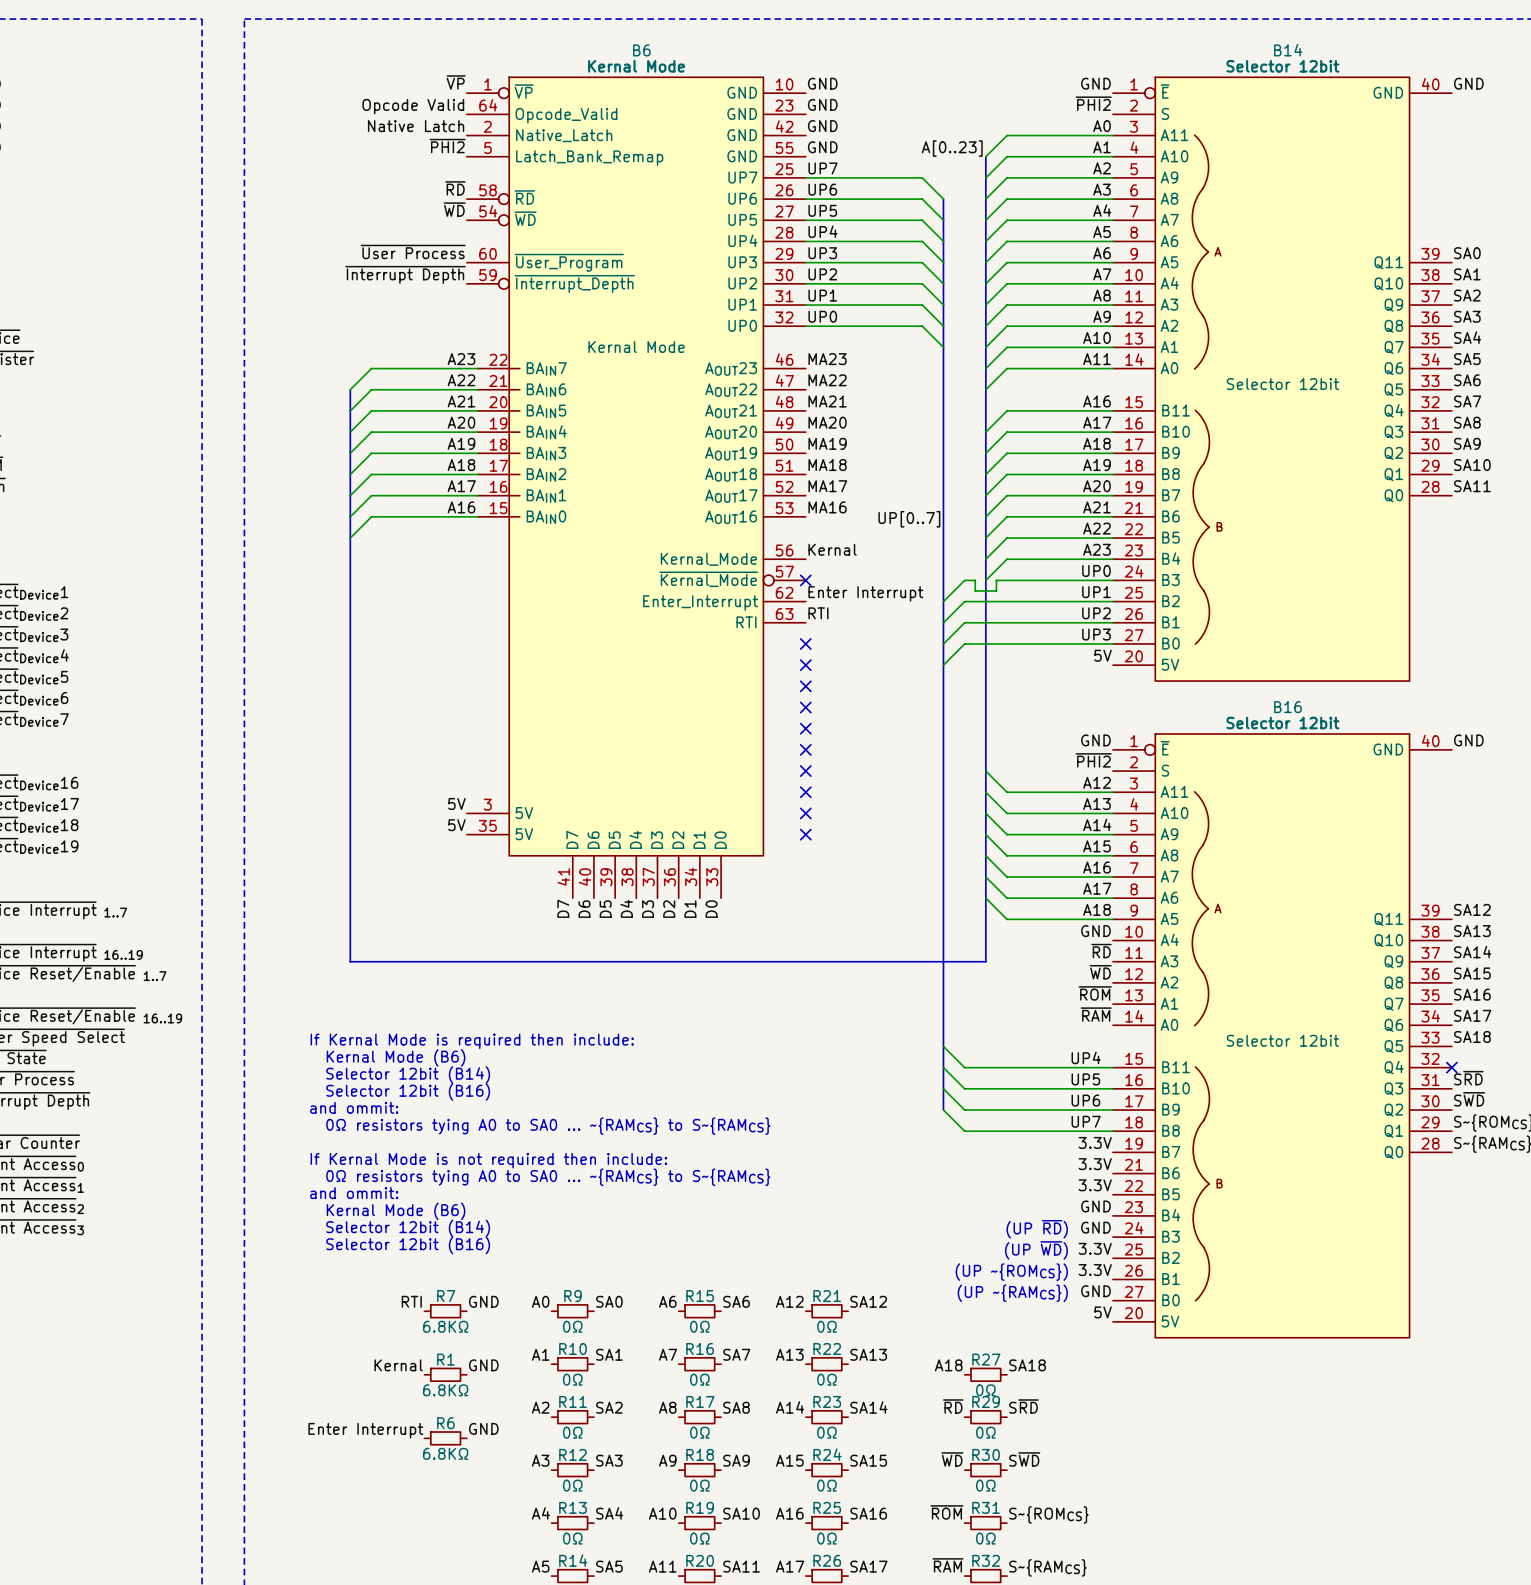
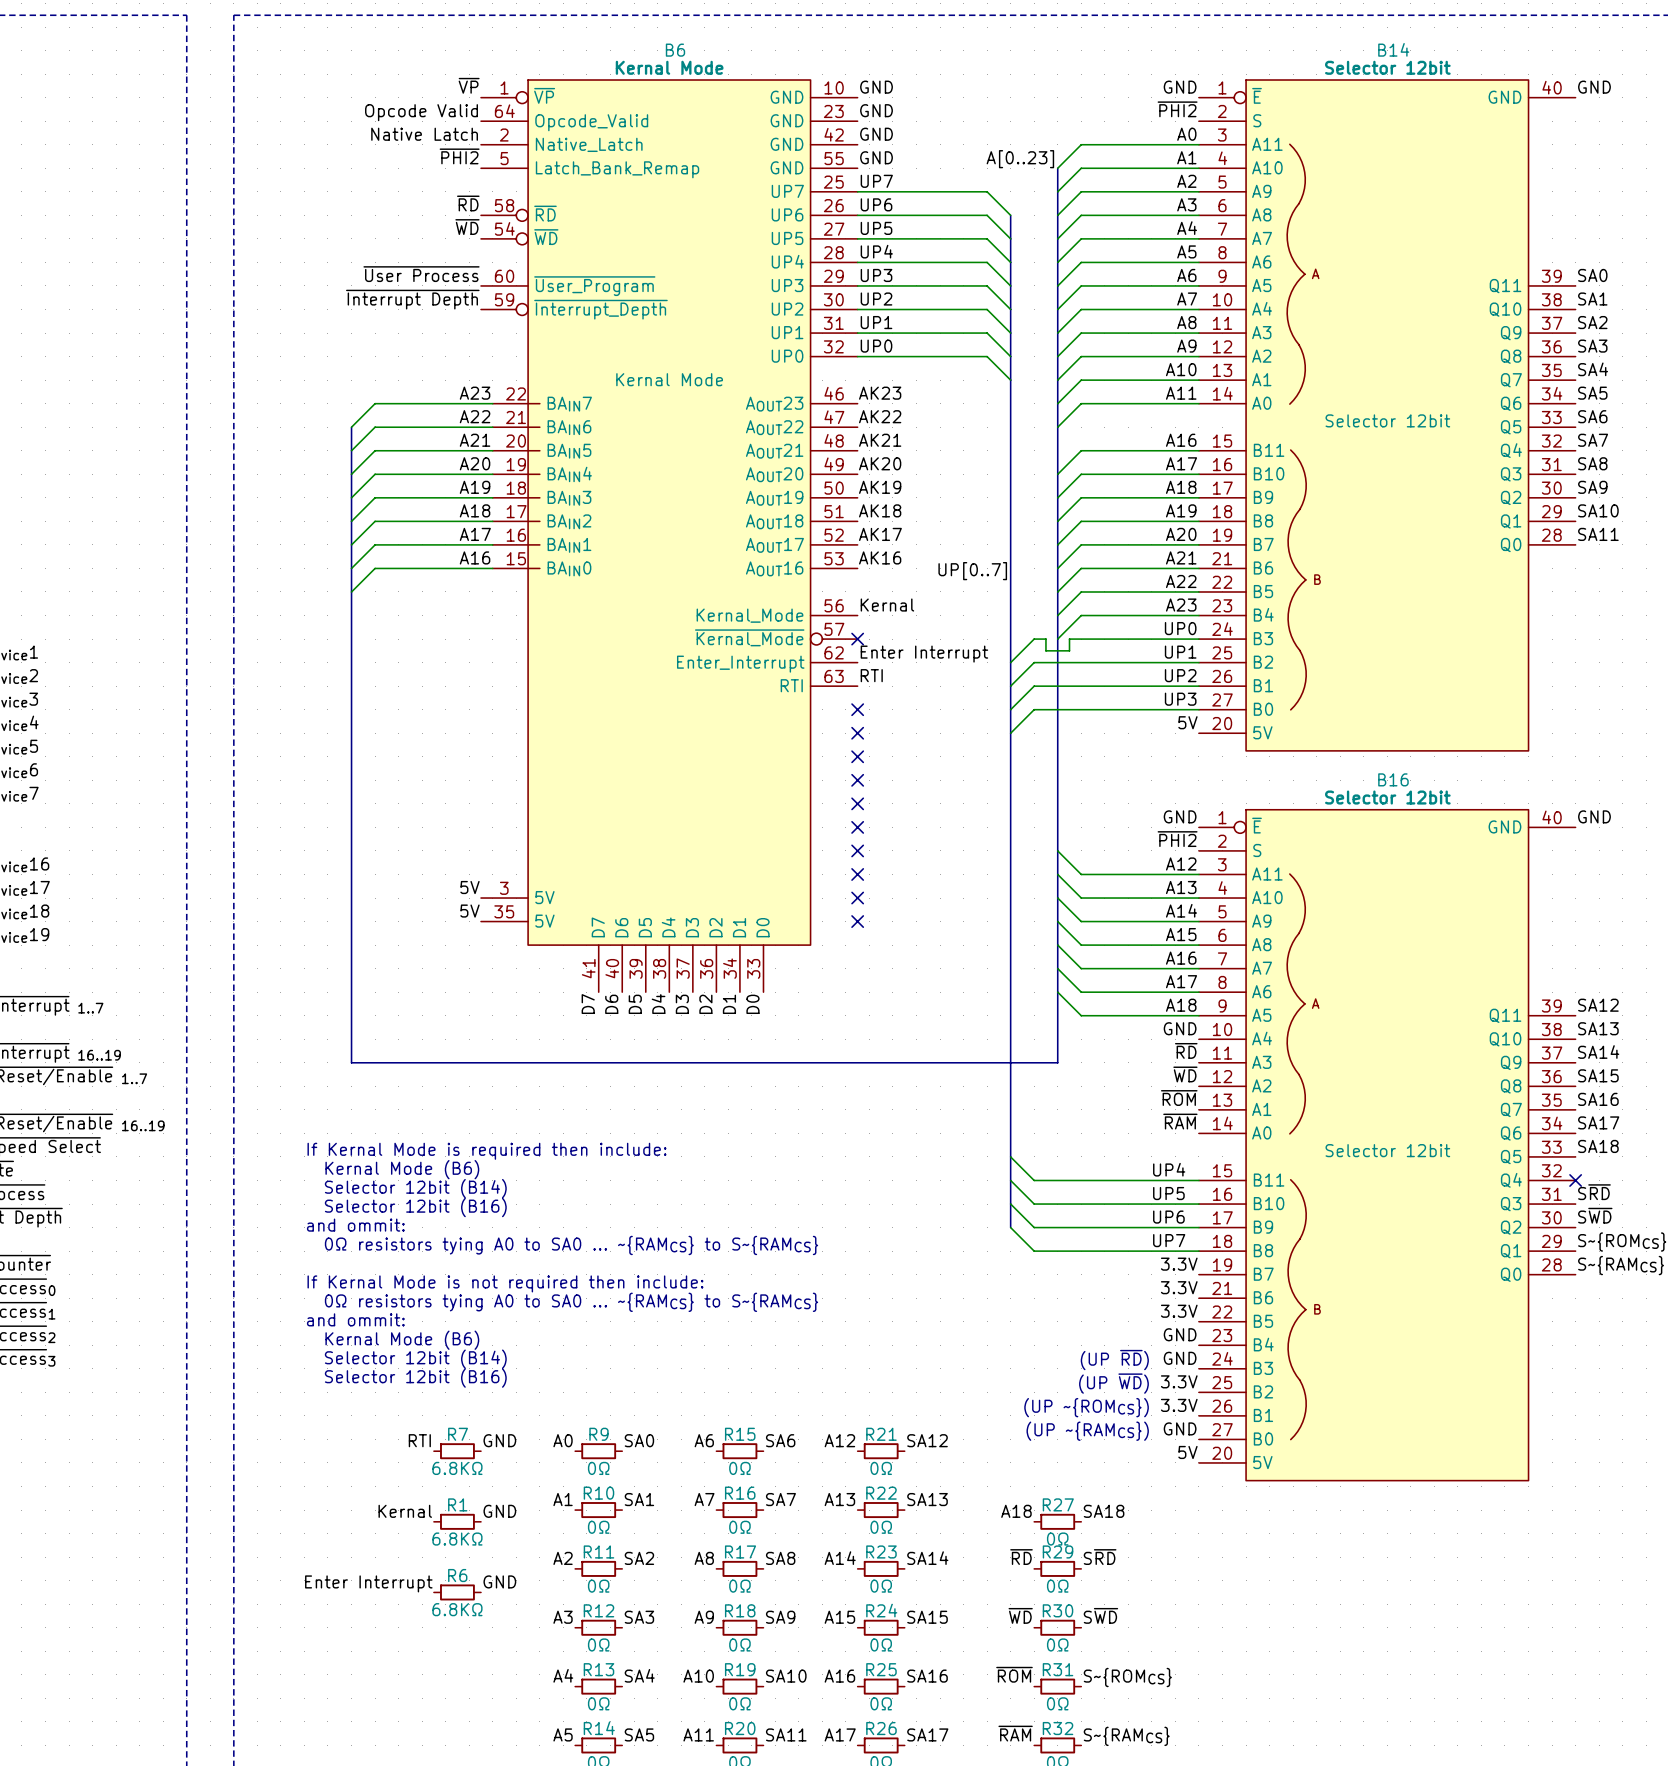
label: MA23 (827, 359) -> AK23 (880, 393)
label: MA22 (827, 380) -> AK22 (880, 416)
label: MA21 (827, 401) -> AK21 (880, 440)
label: MA20 (827, 422) -> AK20 (880, 463)
label: MA19 (827, 443) -> AK19 (880, 487)
label: MA18 (827, 465) -> AK18 (880, 510)
label: MA17 (827, 486) -> AK17 (880, 534)
label: MA16 (827, 507) -> AK16 (880, 557)

